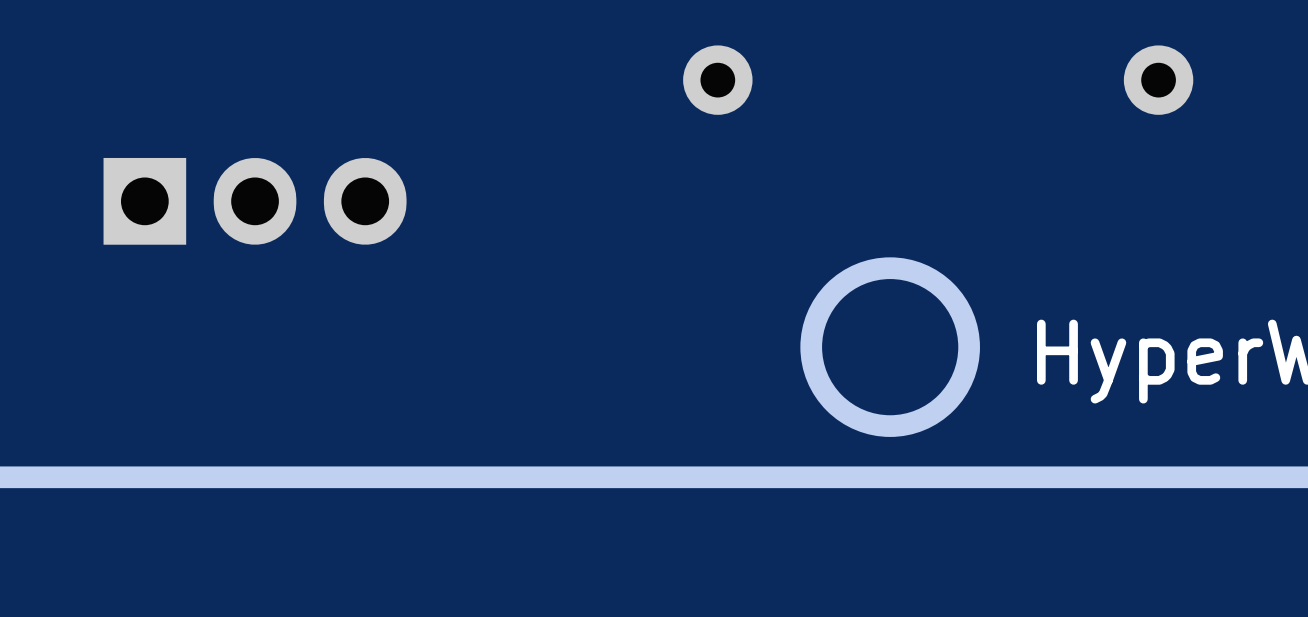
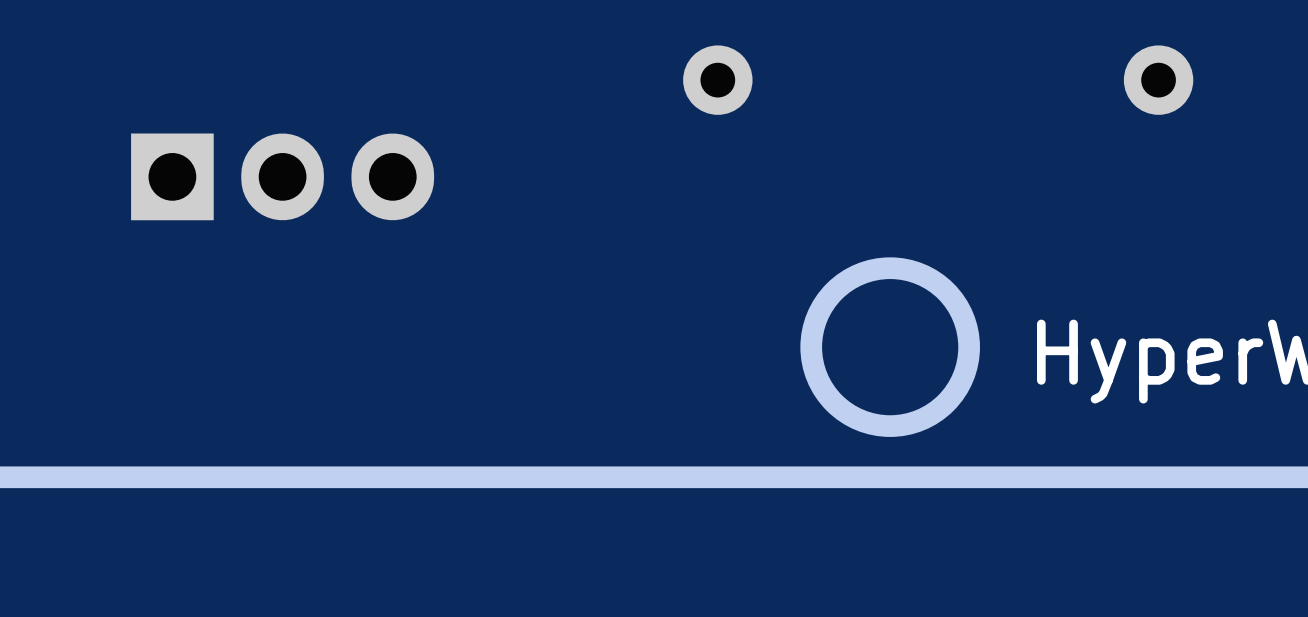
part position: (255, 201) -> (282, 176)

